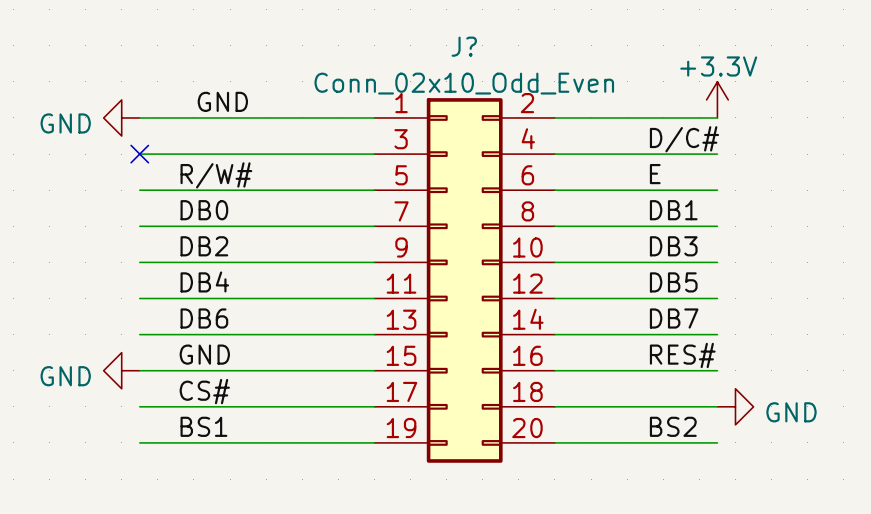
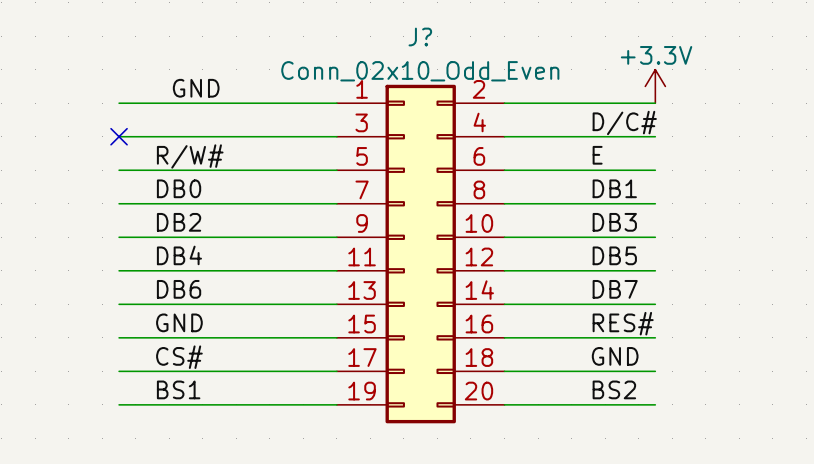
power symbol: GND (121, 117) -> none
power symbol: GND (121, 370) -> none
label: none -> GND (615, 356)
power symbol: GND (735, 406) -> none

